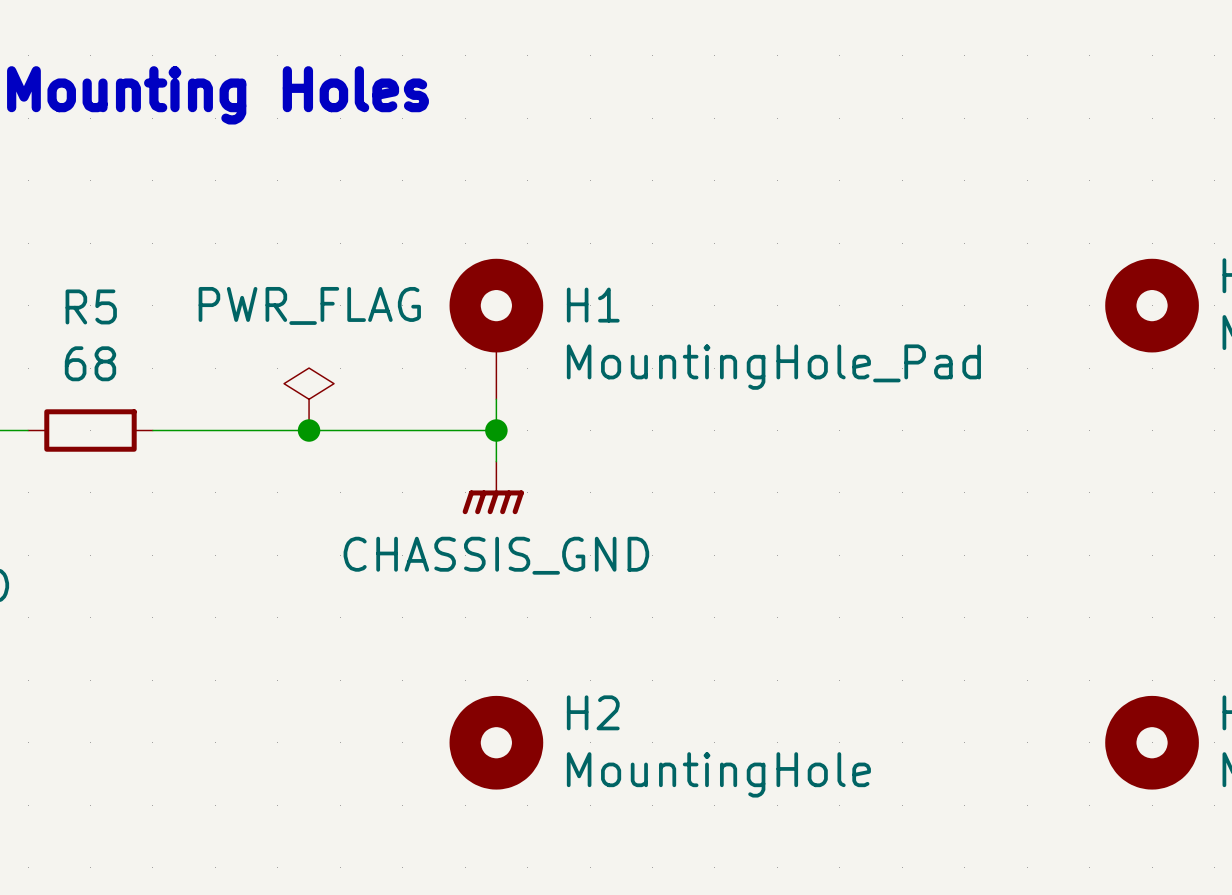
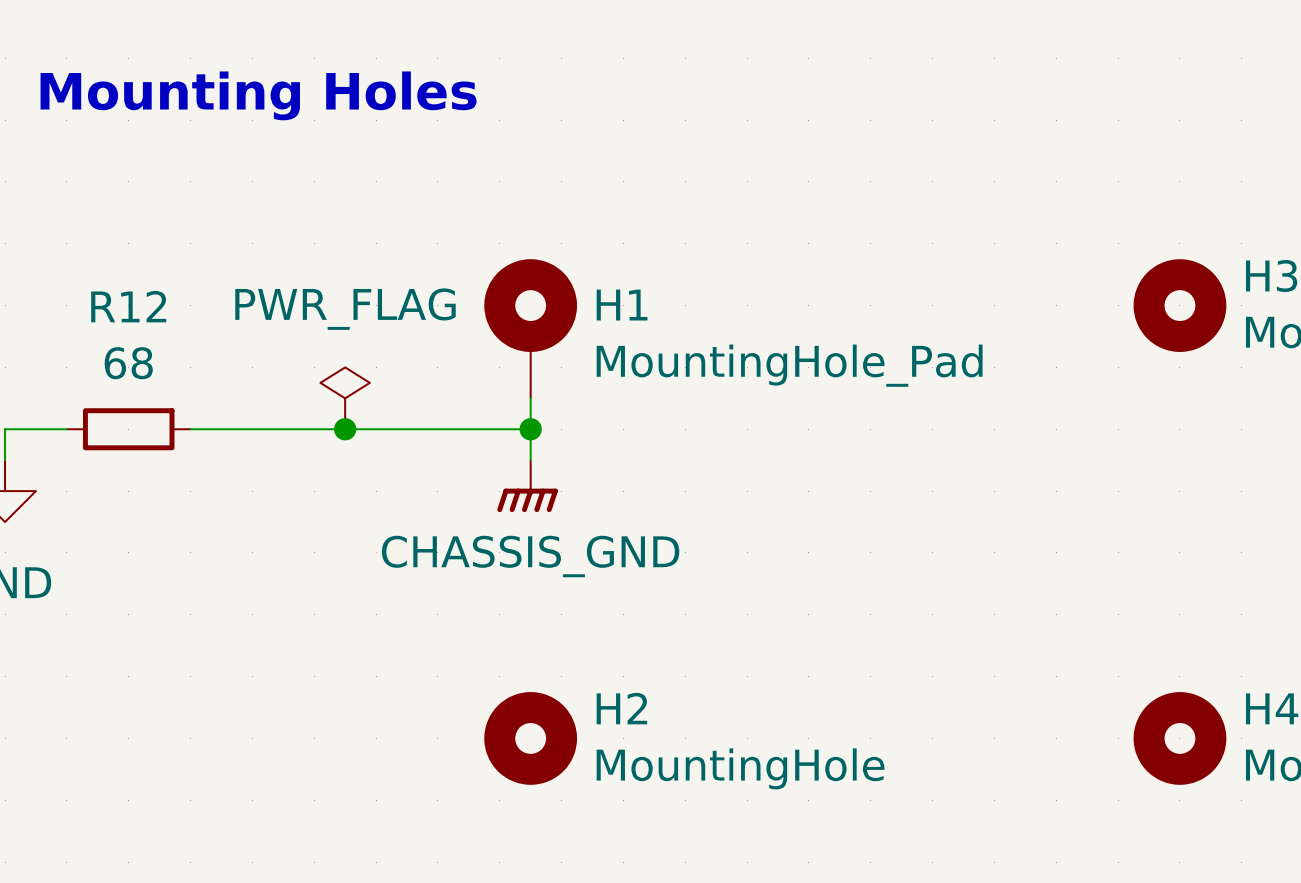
R5 name: R5 (91, 306) -> R12 (128, 306)

